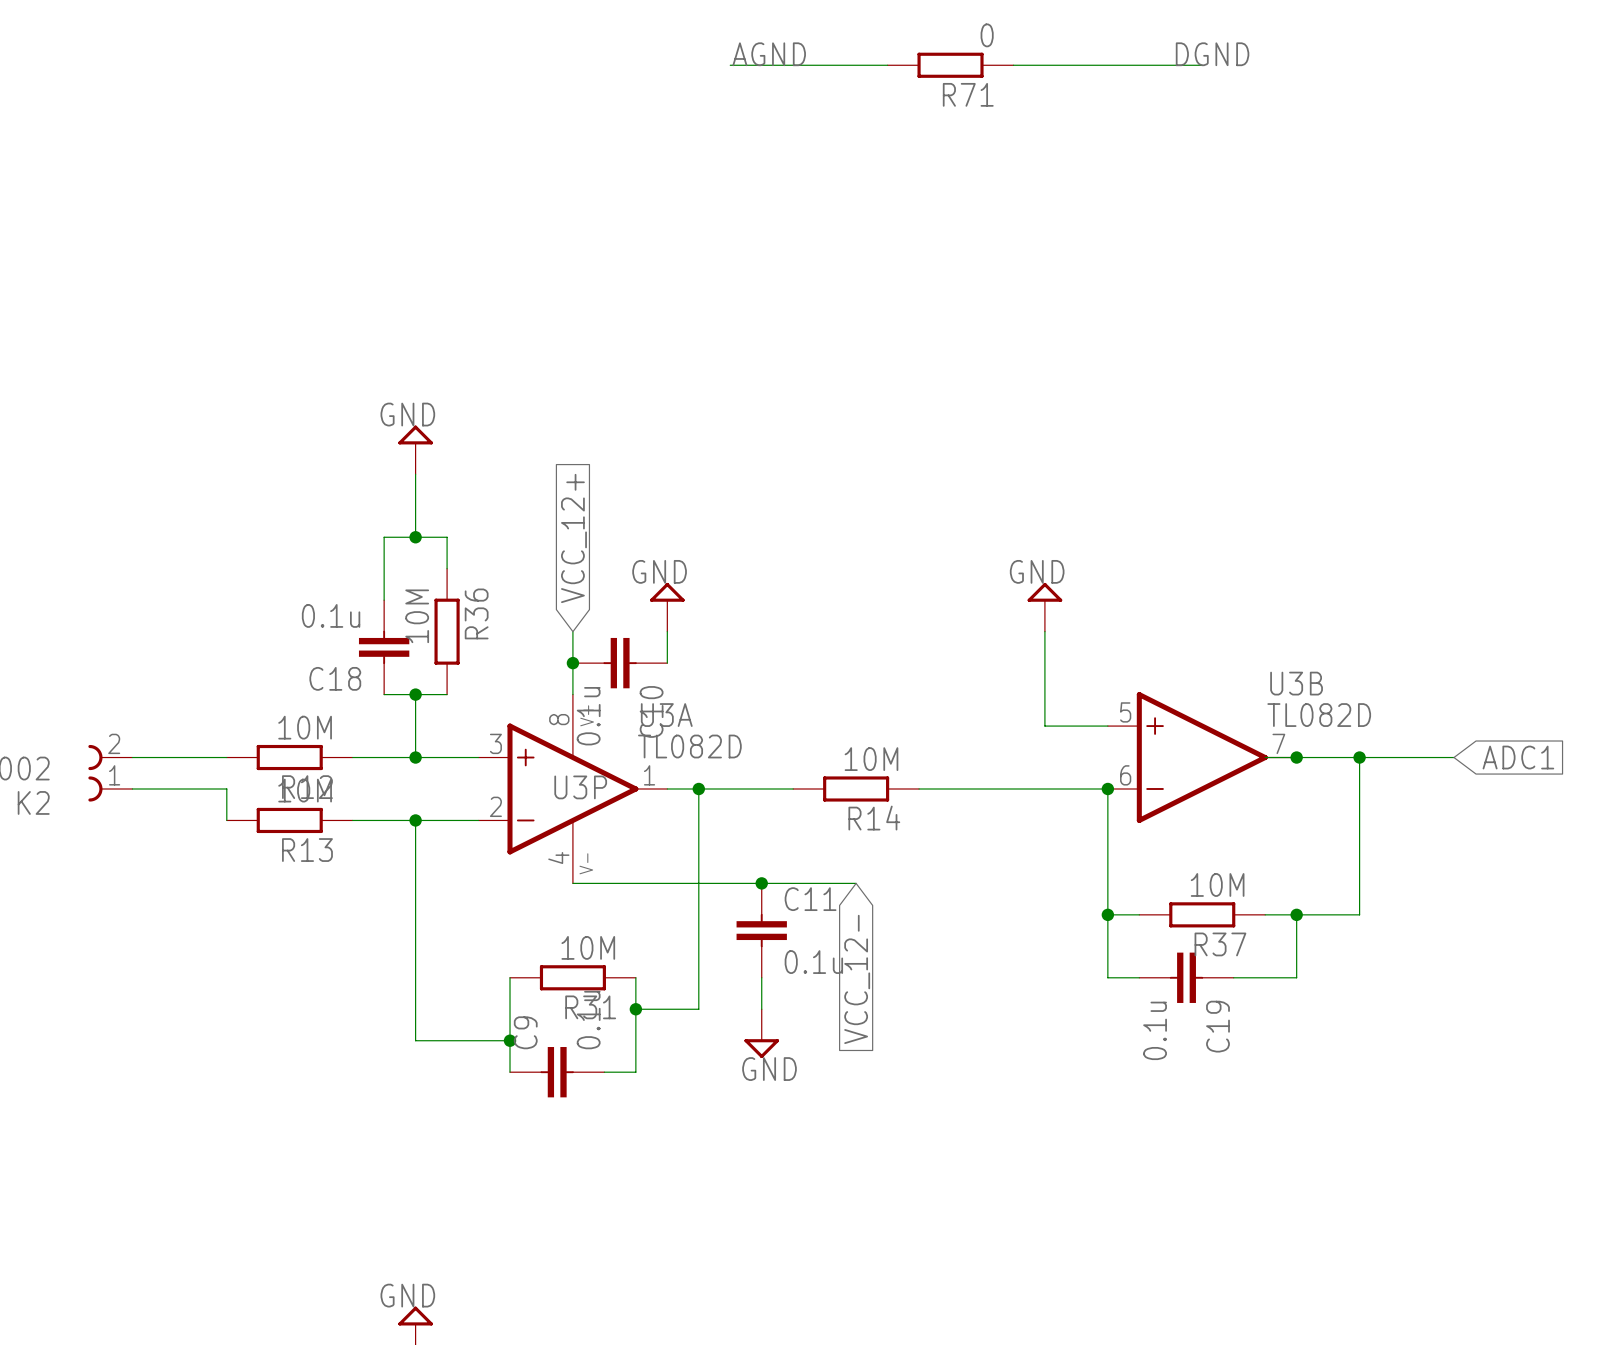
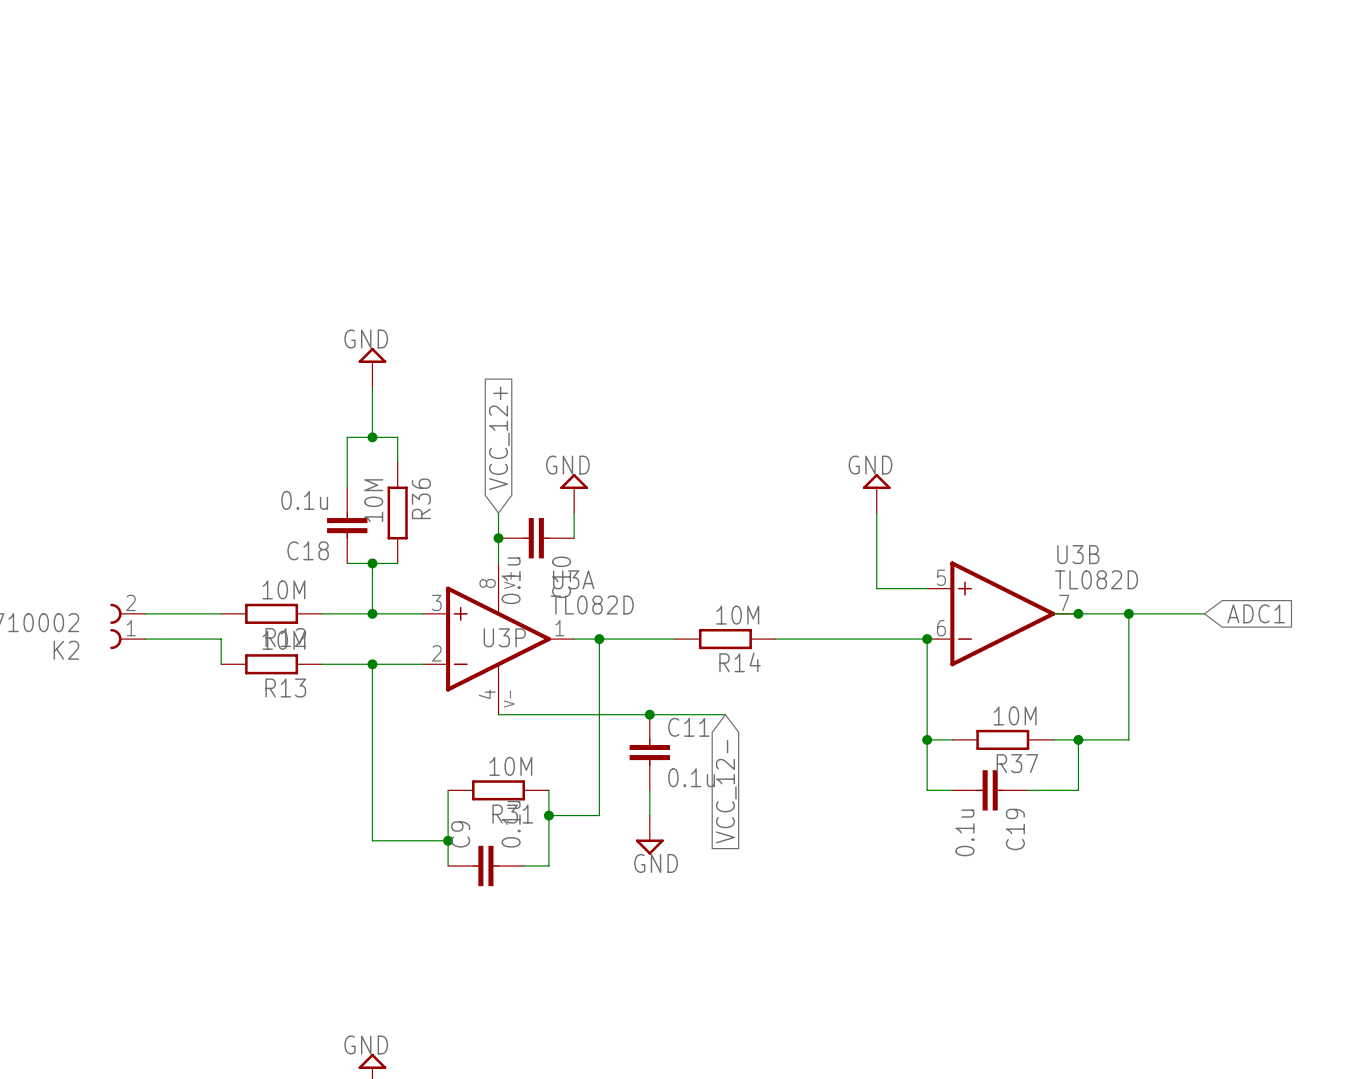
label: AGND (769, 54) -> none
label: DGND (1212, 54) -> none
wire: (730, 65) (887, 65) -> none
R71: 0 (950, 65) -> none
wire: (1013, 65) (1202, 65) -> none

